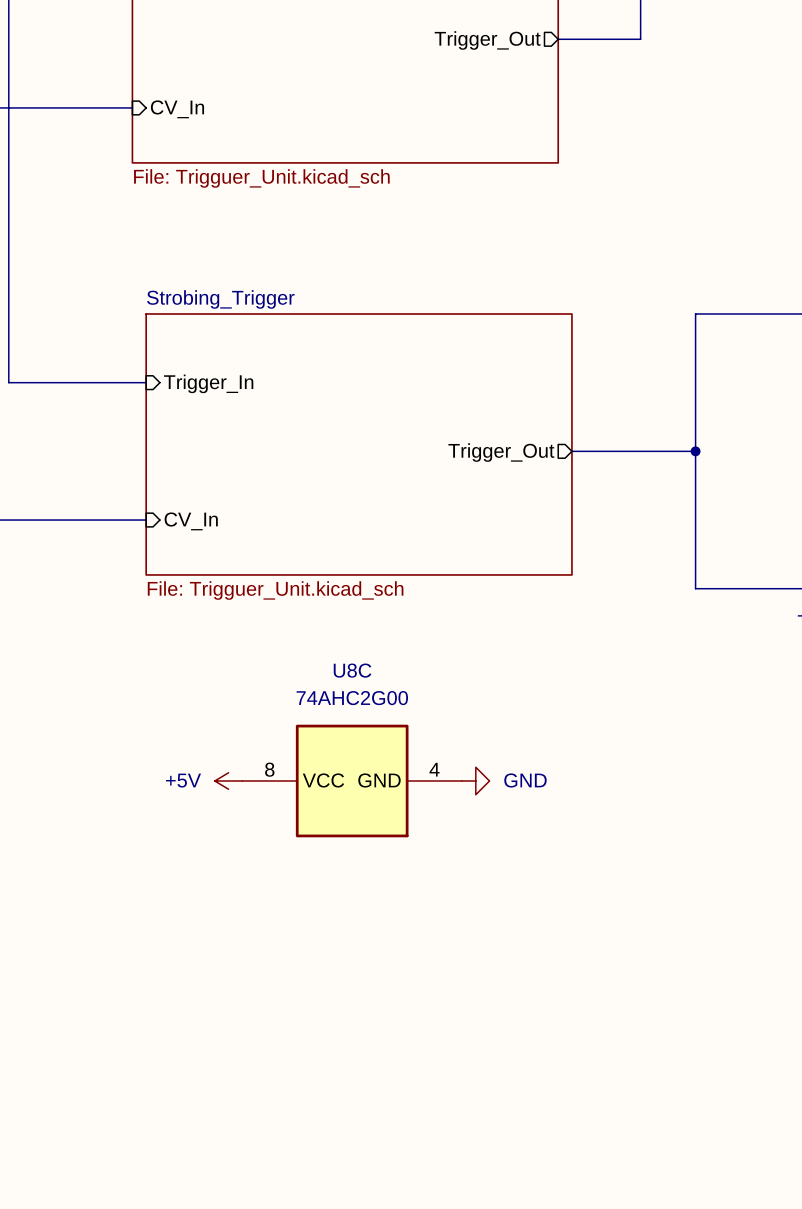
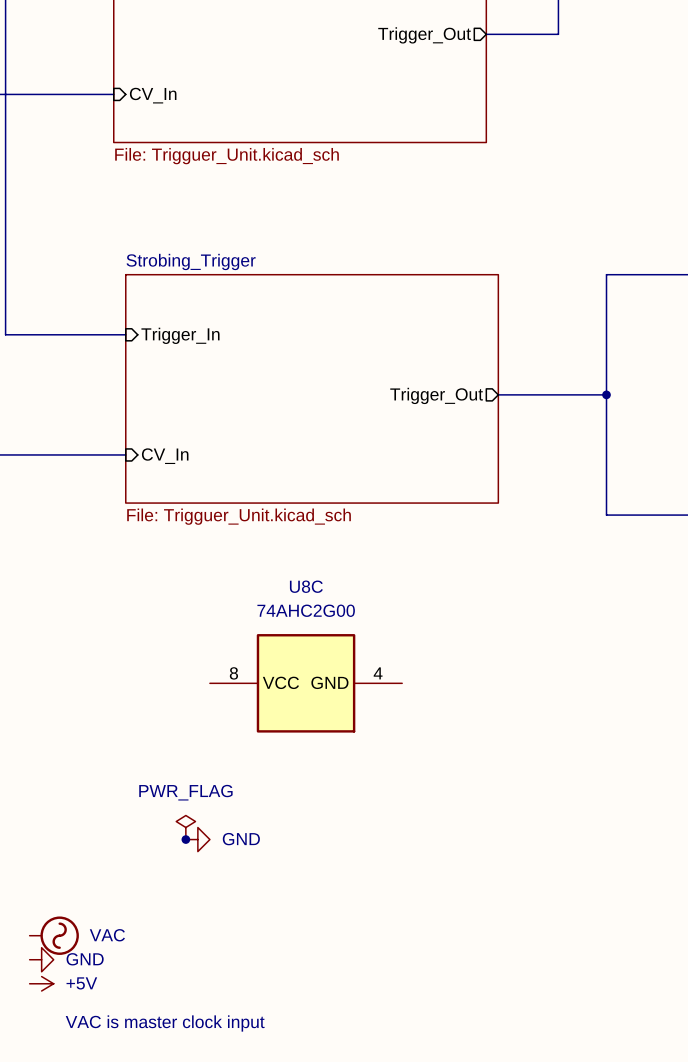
power symbol: +5V (228, 781) -> none
power symbol: GND (475, 781) -> none
power symbol: none -> PWR_FLAG (185, 827)
junction: none -> (185, 839)
power symbol: none -> GND (197, 839)
power symbol: none -> VAC (54, 935)
power symbol: none -> GND (41, 959)
power symbol: none -> +5V (41, 983)
text: none -> VAC is master clock input (165, 1023)

